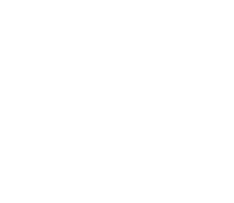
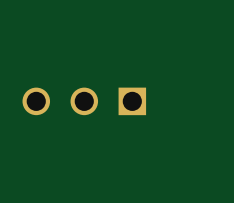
part: none -> (84, 101)

